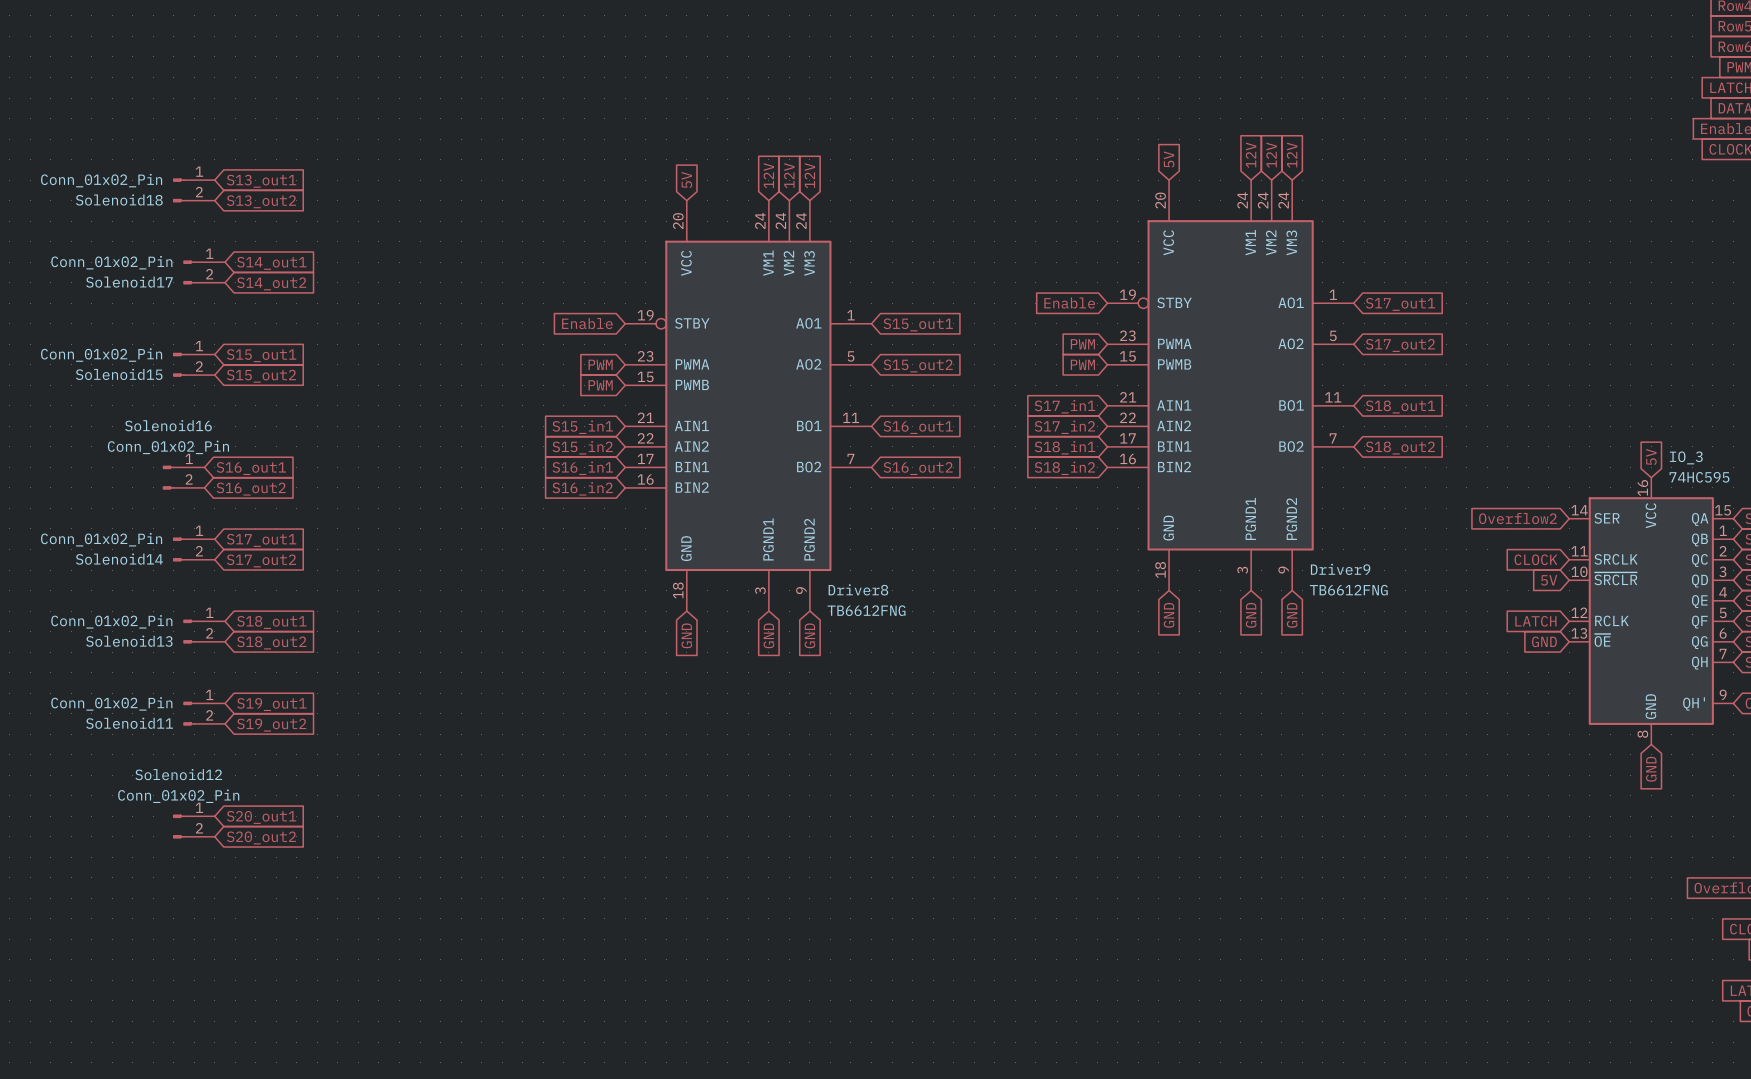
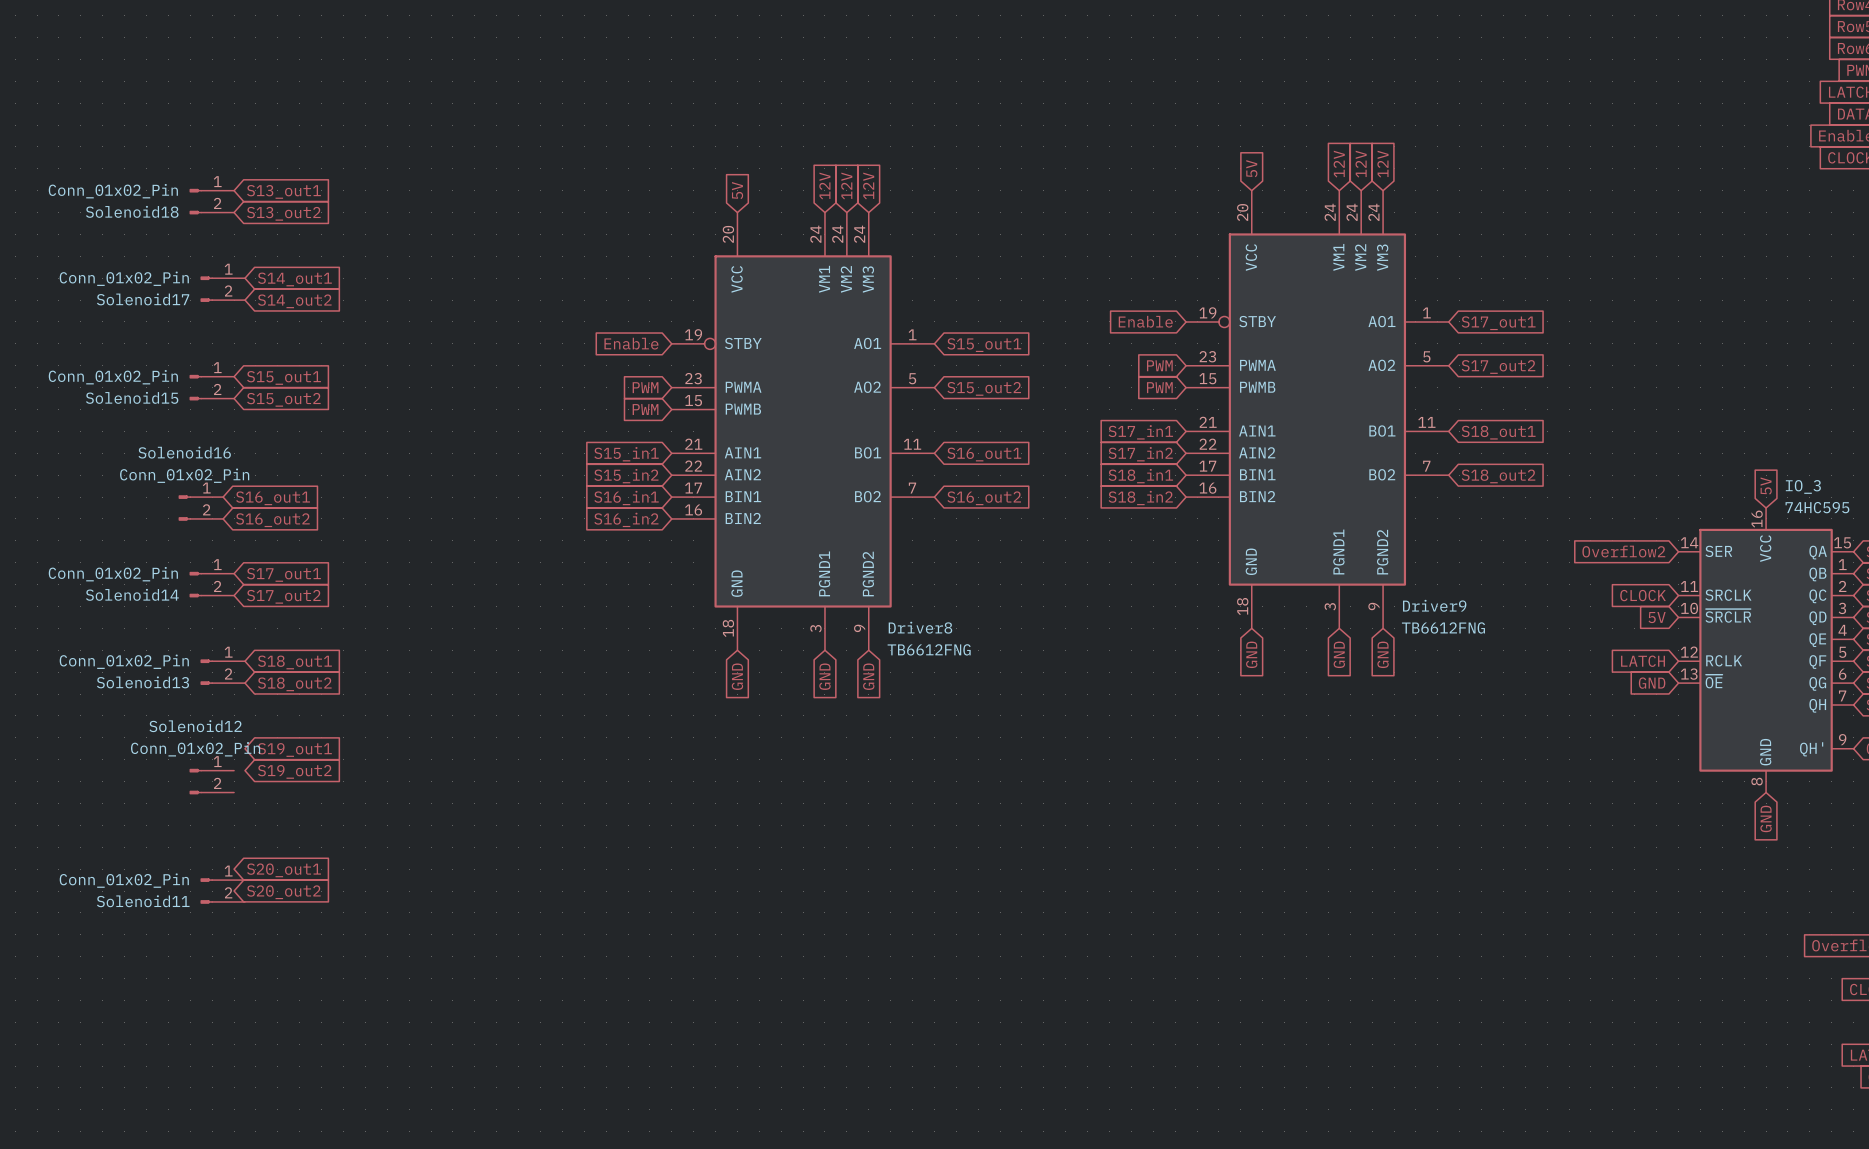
Solenoid11 position: (204, 713) -> (222, 891)
Solenoid12 position: (193, 826) -> (211, 781)

